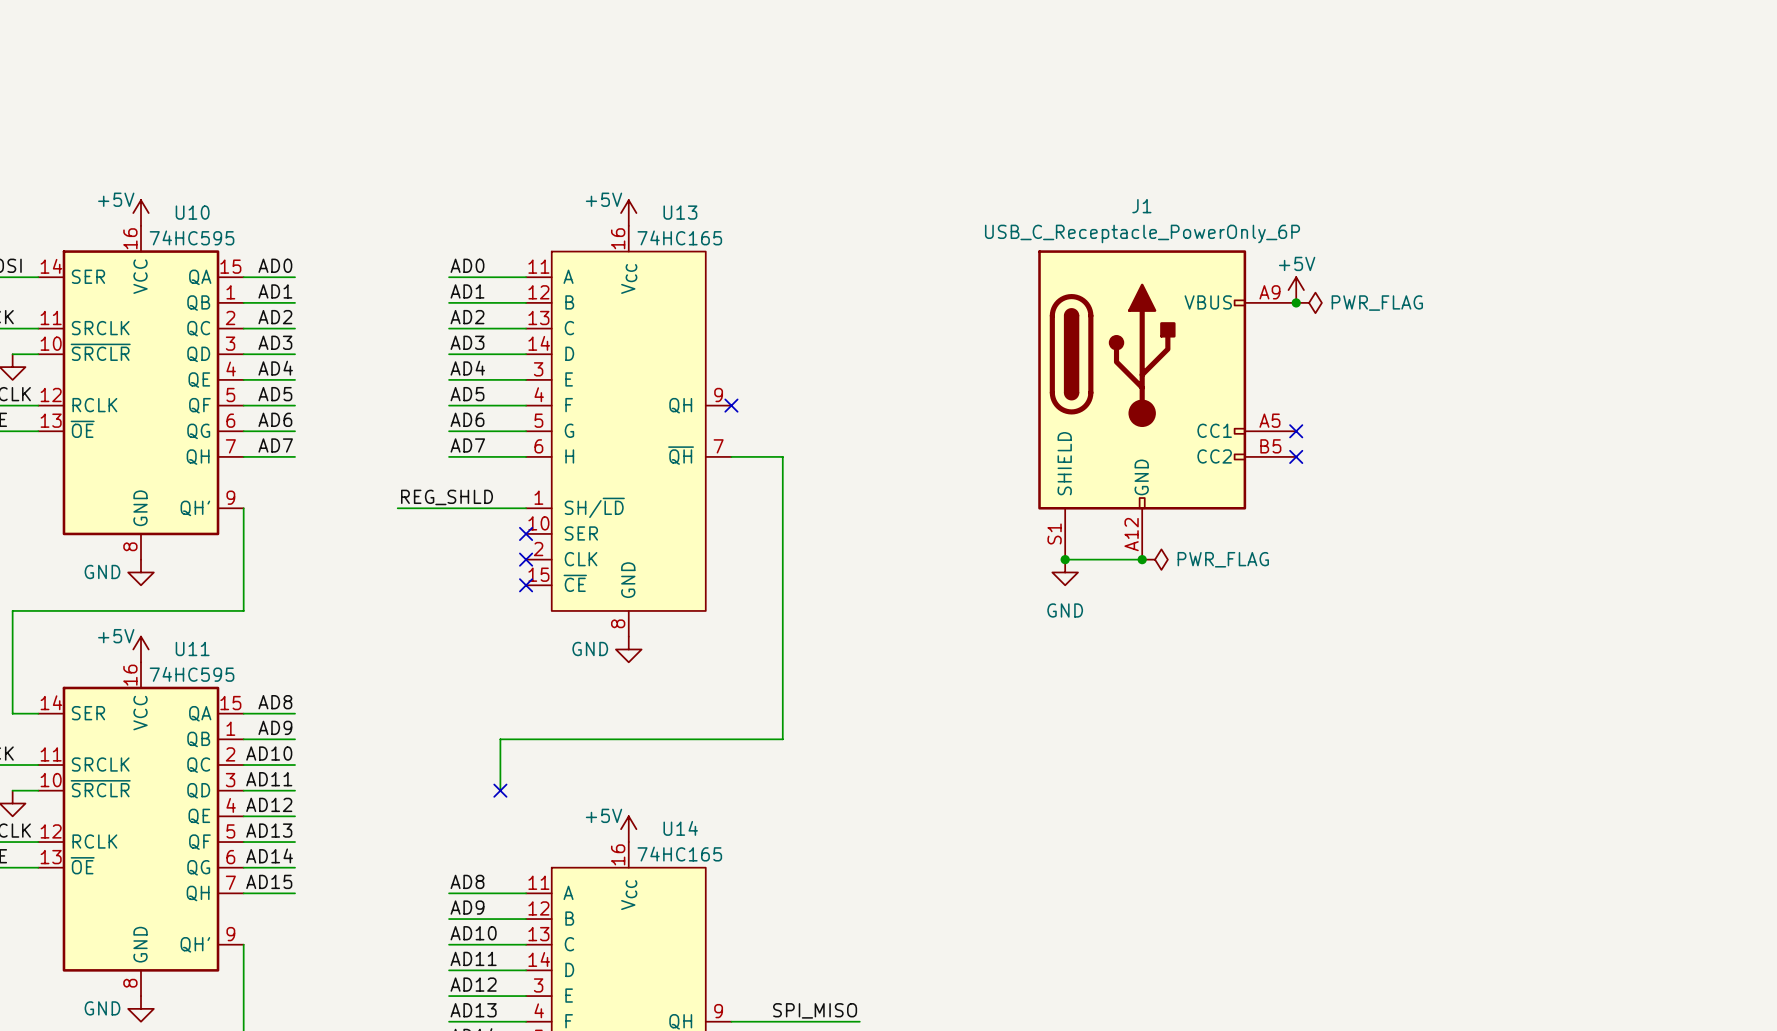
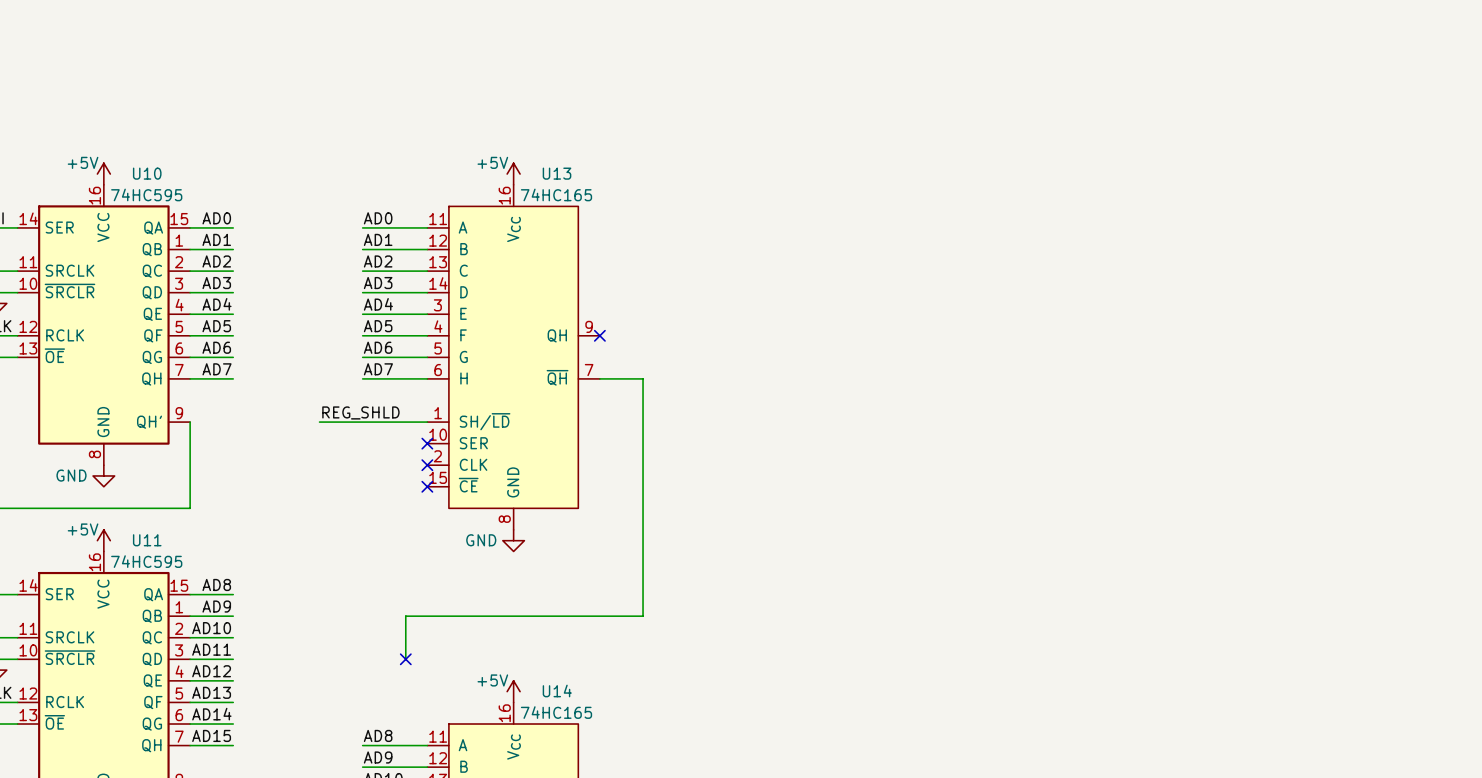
power symbol: +5V (1296, 290) -> none
junction: (1296, 302) -> none
power symbol: PWR_FLAG (1309, 302) -> none
J1: USB_C_Receptacle_PowerOnly_6P (1167, 404) -> none
no-connect mark: (1296, 431) -> none
no-connect mark: (1296, 456) -> none
wire: (1065, 559) (1142, 559) -> none
junction: (1065, 559) -> none
junction: (1142, 559) -> none
power symbol: PWR_FLAG (1155, 559) -> none
power symbol: GND (1065, 572) -> none

